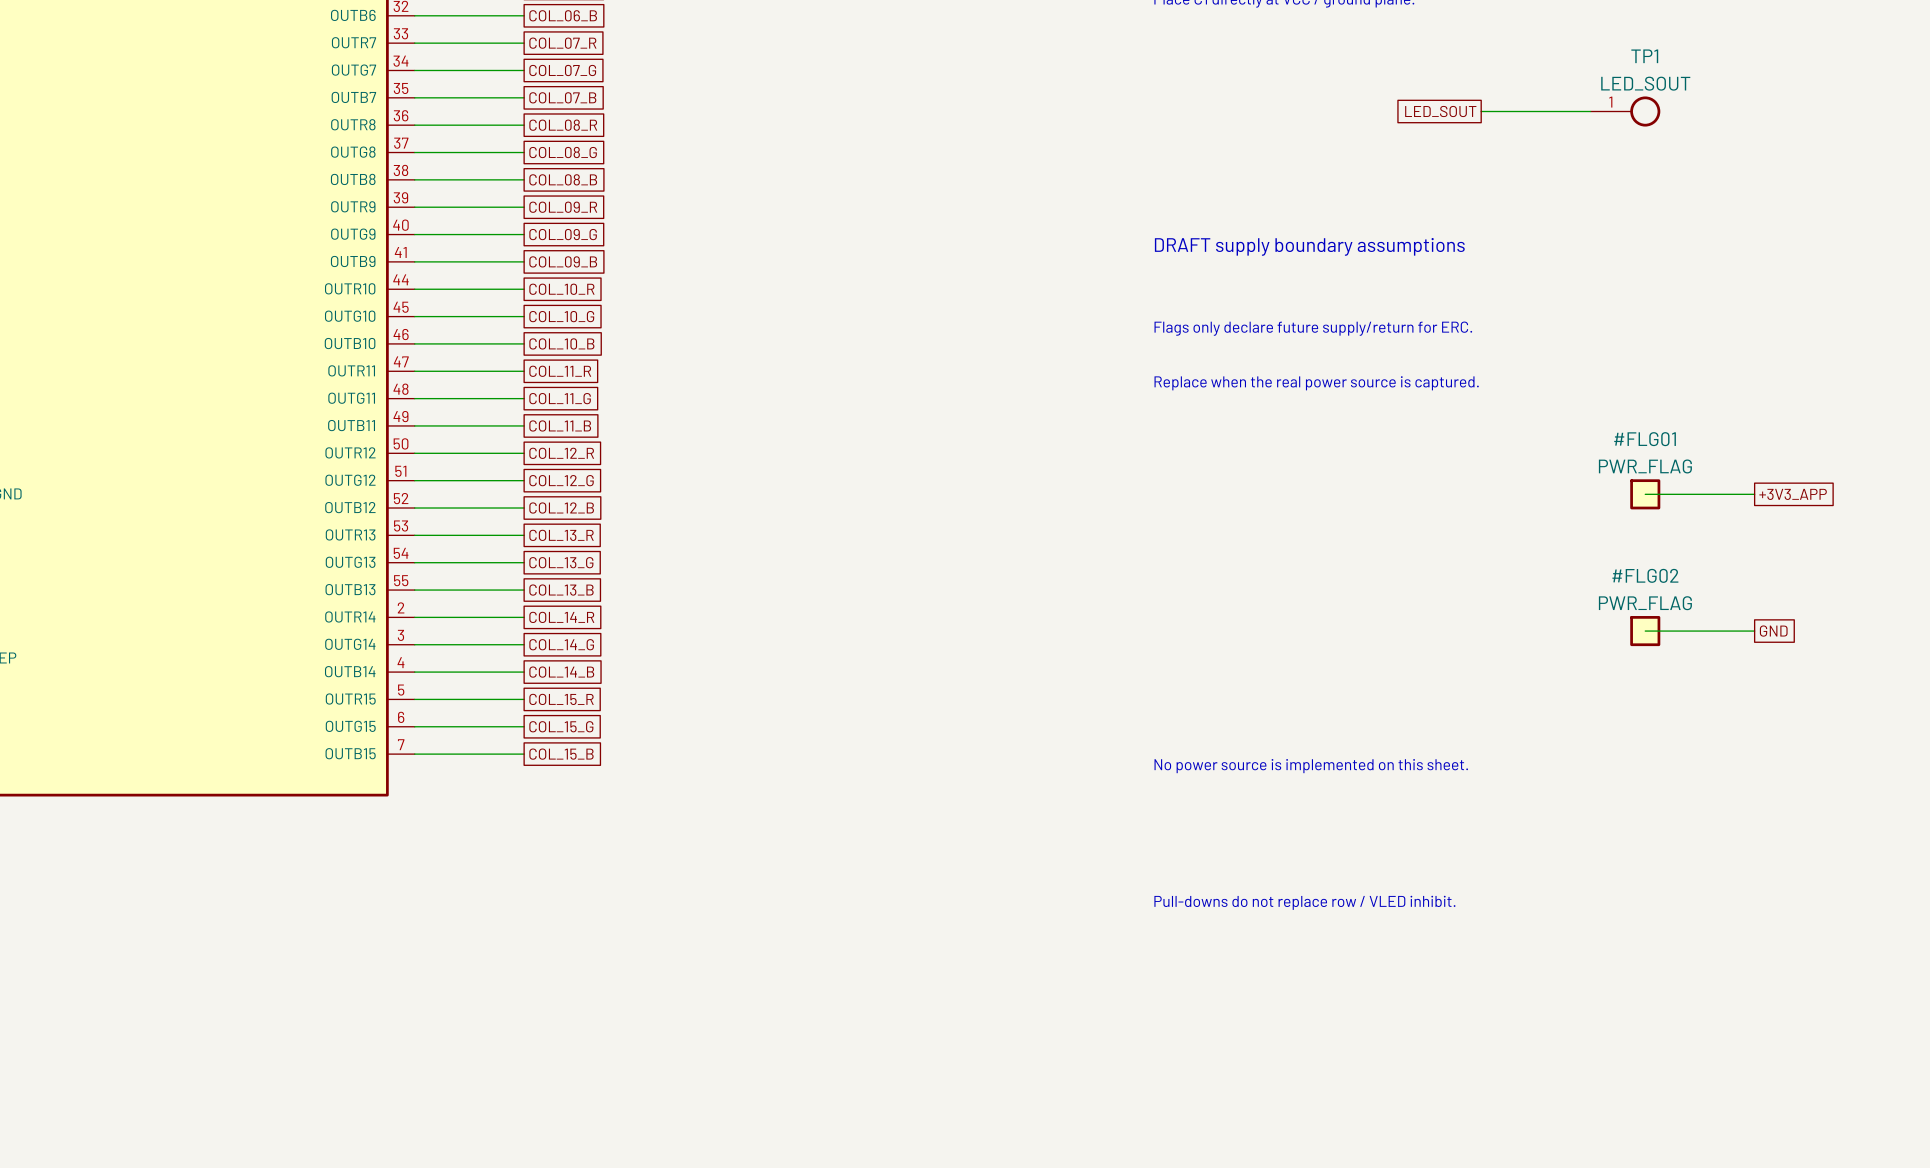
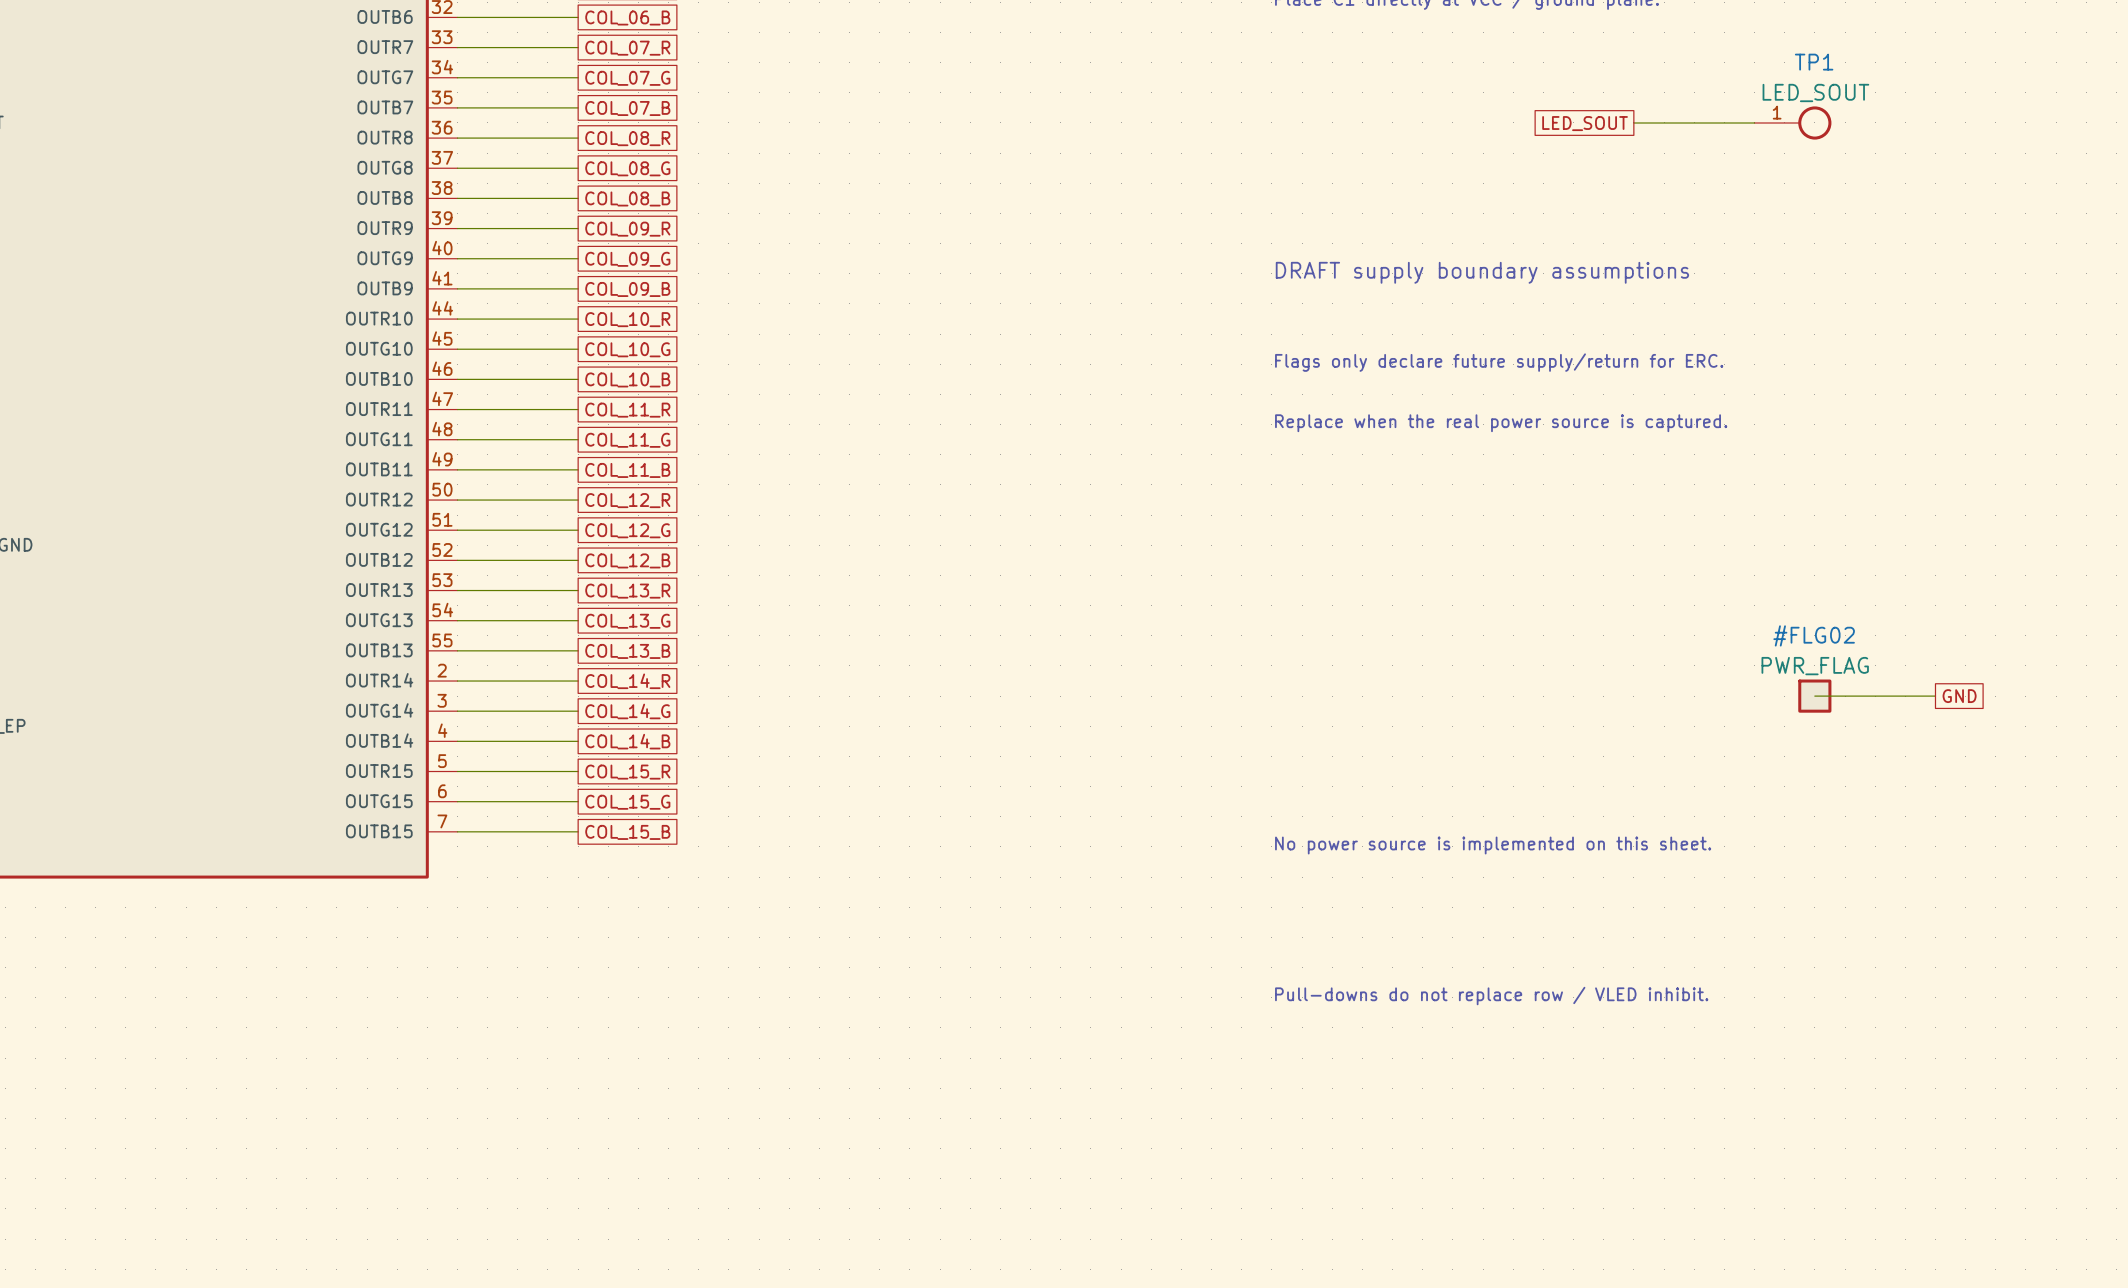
wire: (1645, 494) (1754, 494) -> none
#FLG01: PWR_FLAG (1645, 494) -> none
global label: +3V3_APP (1793, 494) -> none

